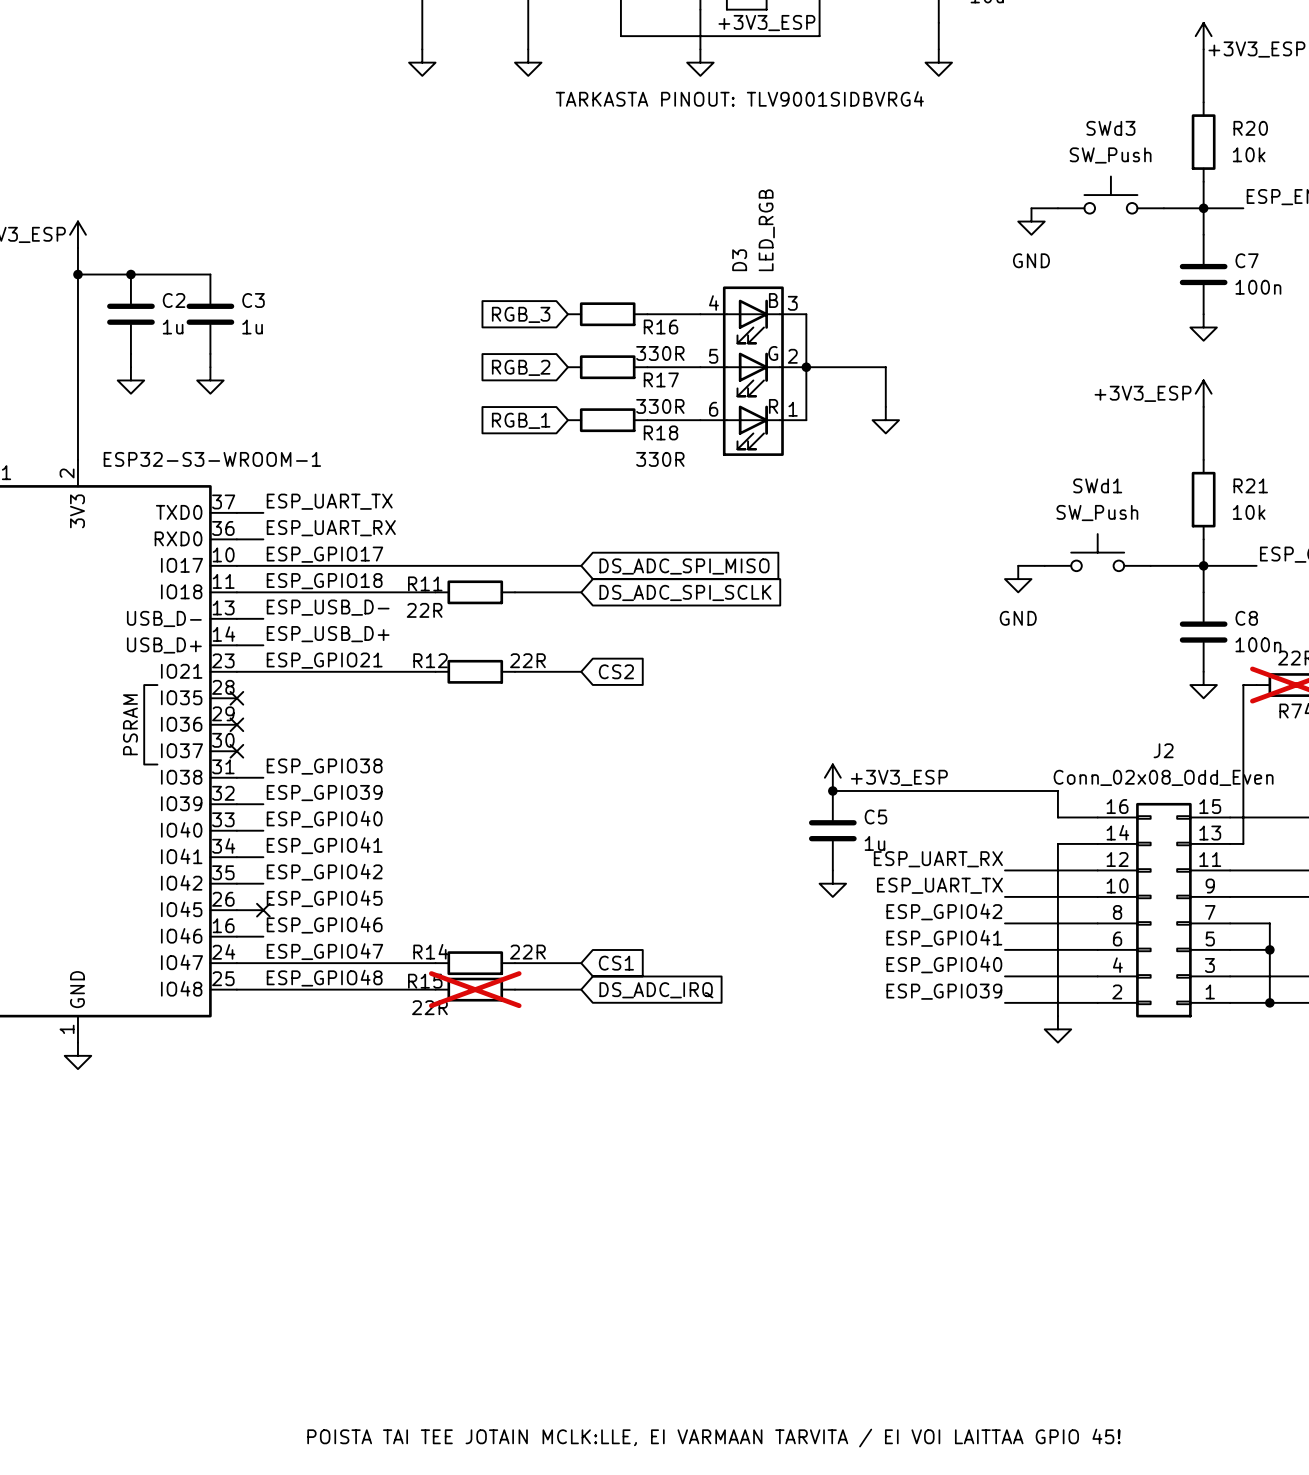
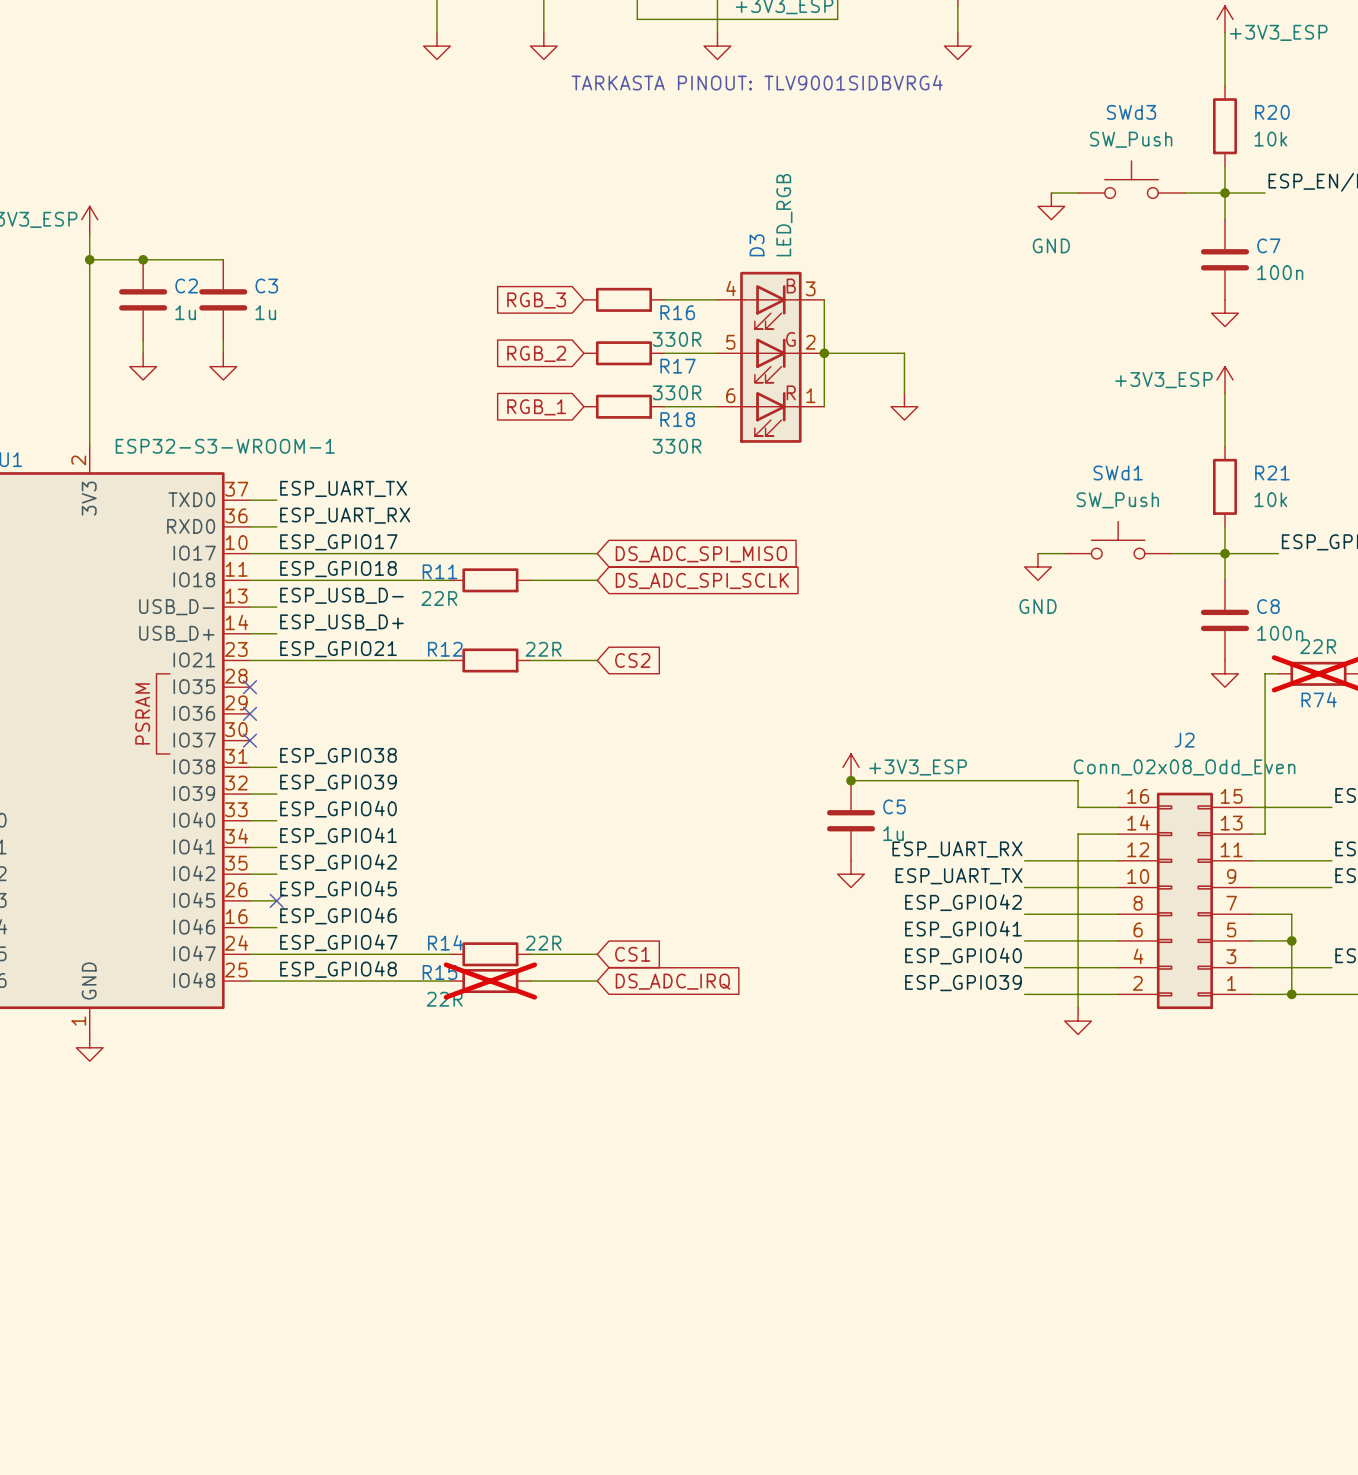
text: POISTA TAI TEE JOTAIN MCLK:LLE, EI VARMAAN TARVITA / EI VOI LAITTAA GPIO 45! (713, 1438) -> none

